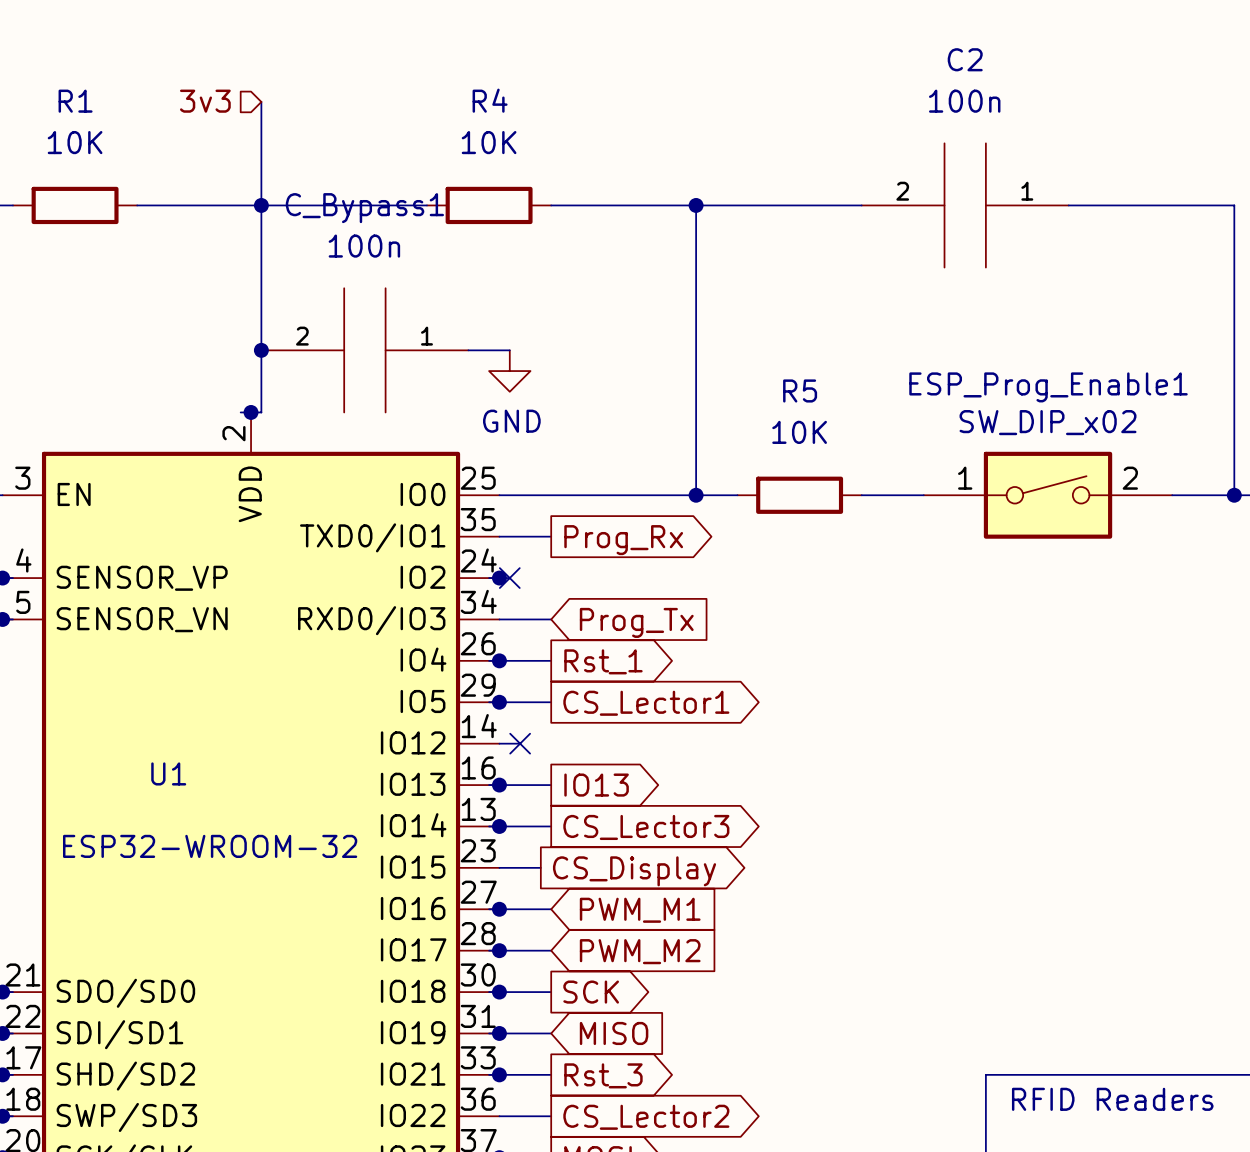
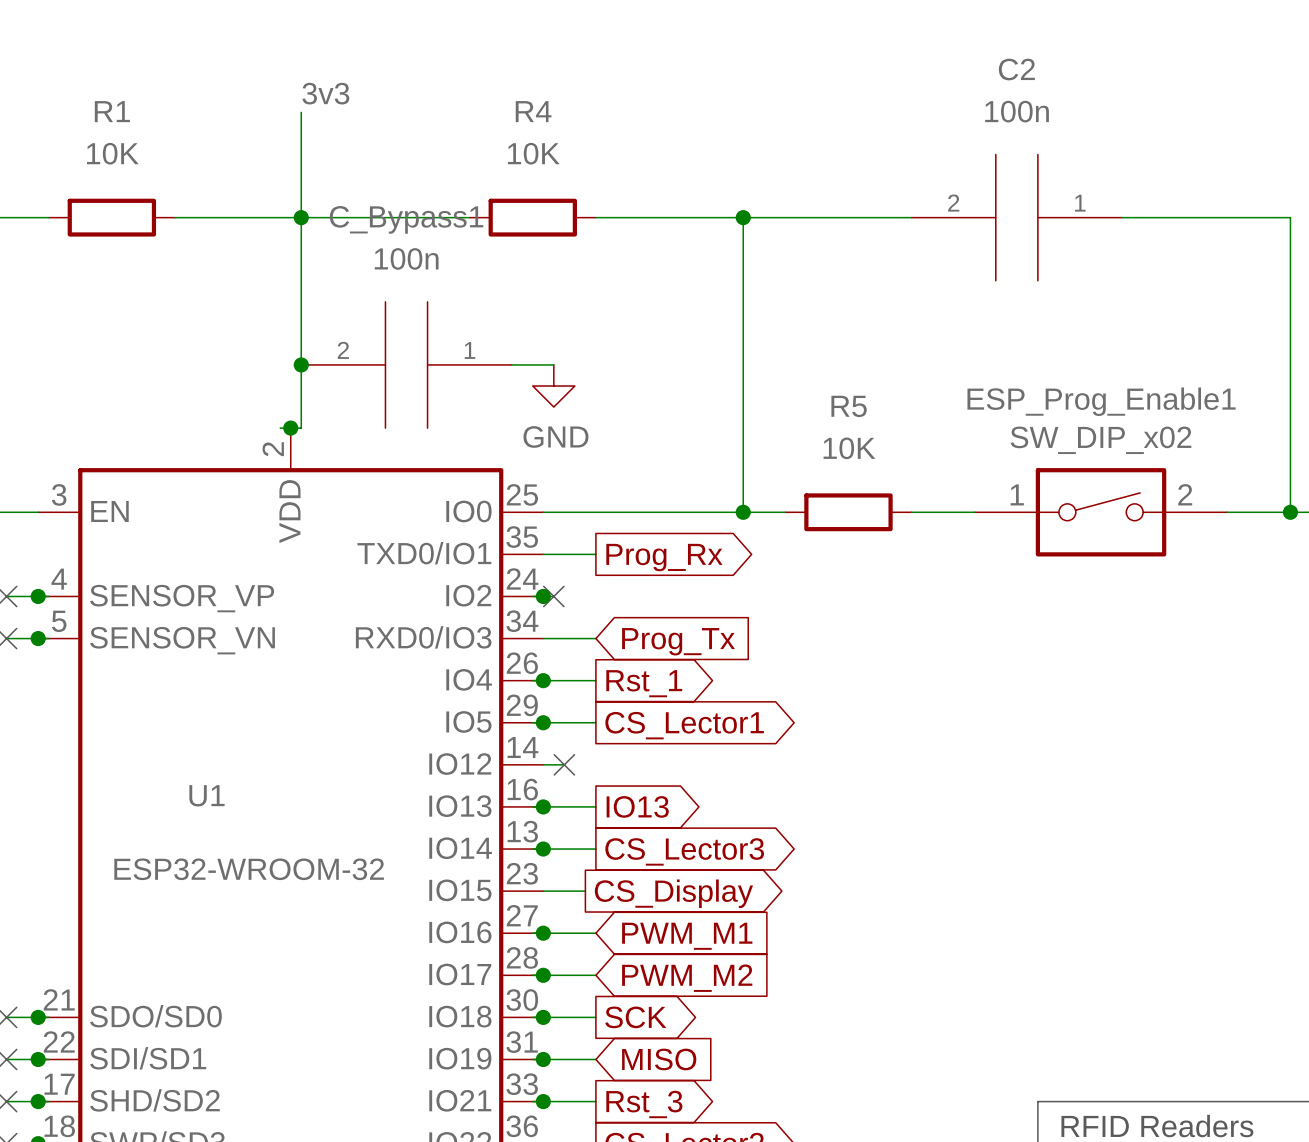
label: none -> 3v3 (325, 93)
hierarchical label: 3v3 (205, 101) -> none

